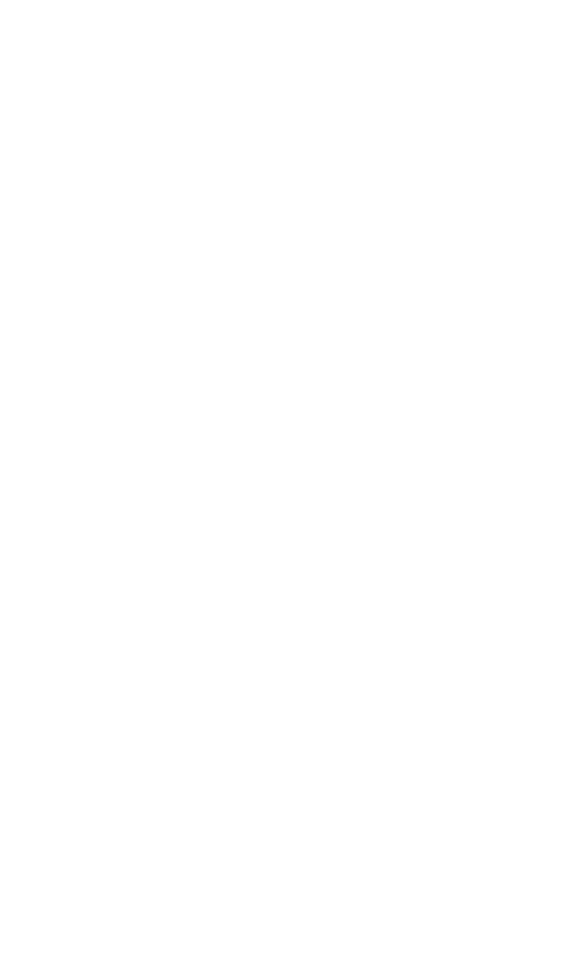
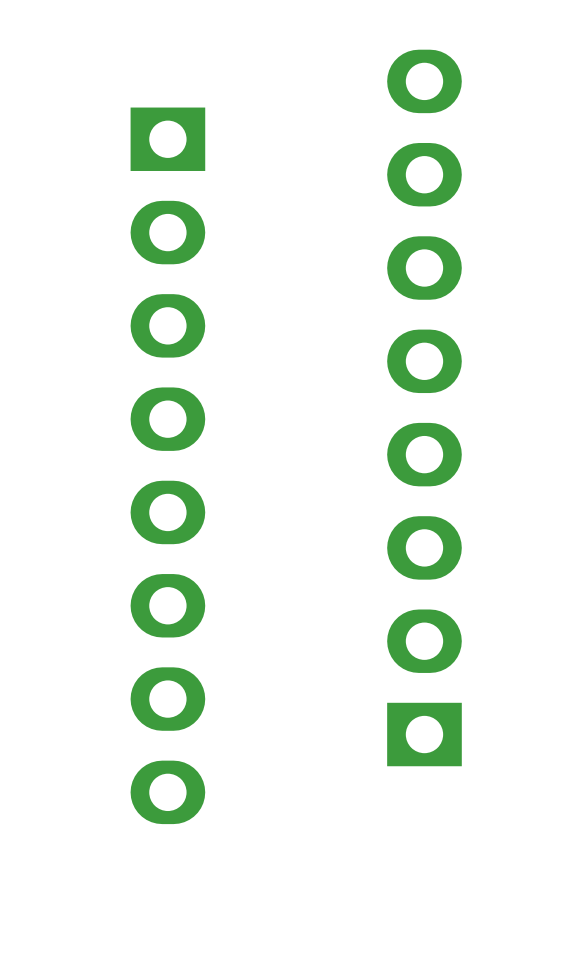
part: none -> (424, 407)
part: none -> (167, 465)

